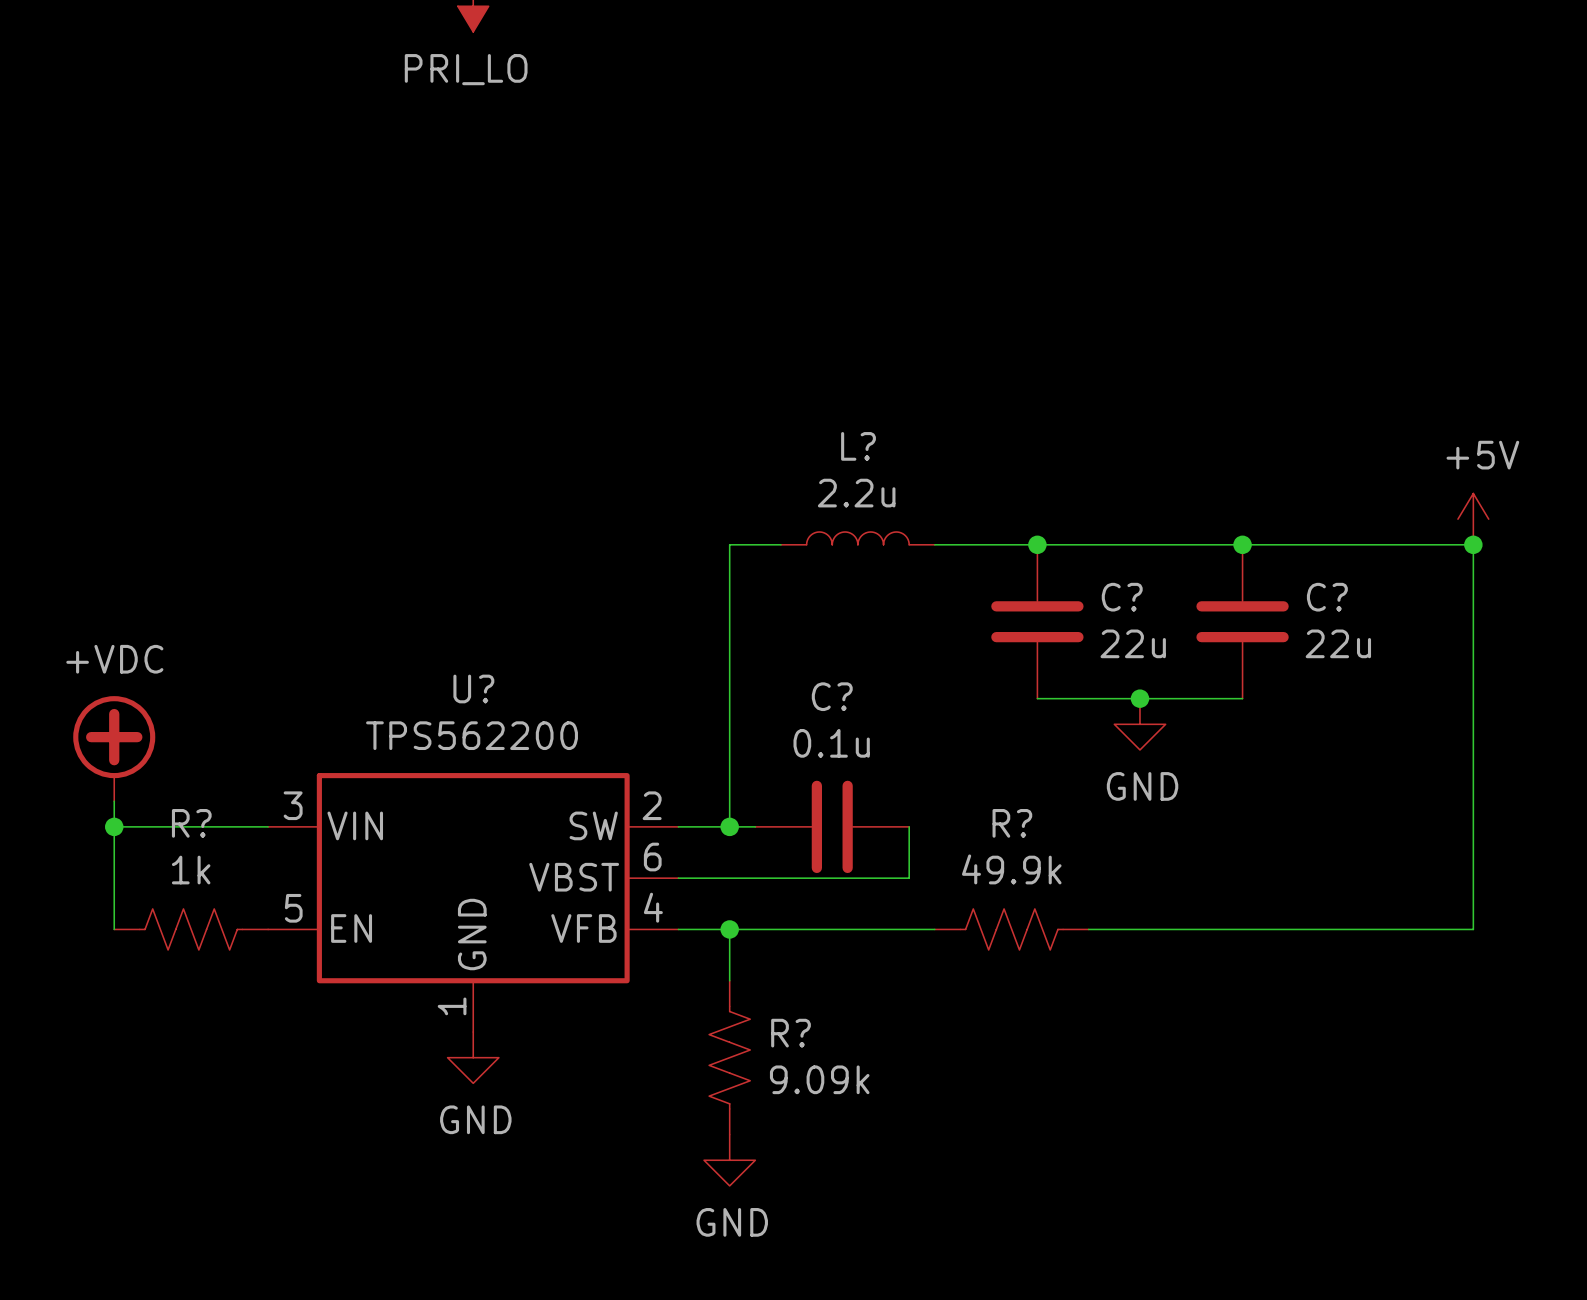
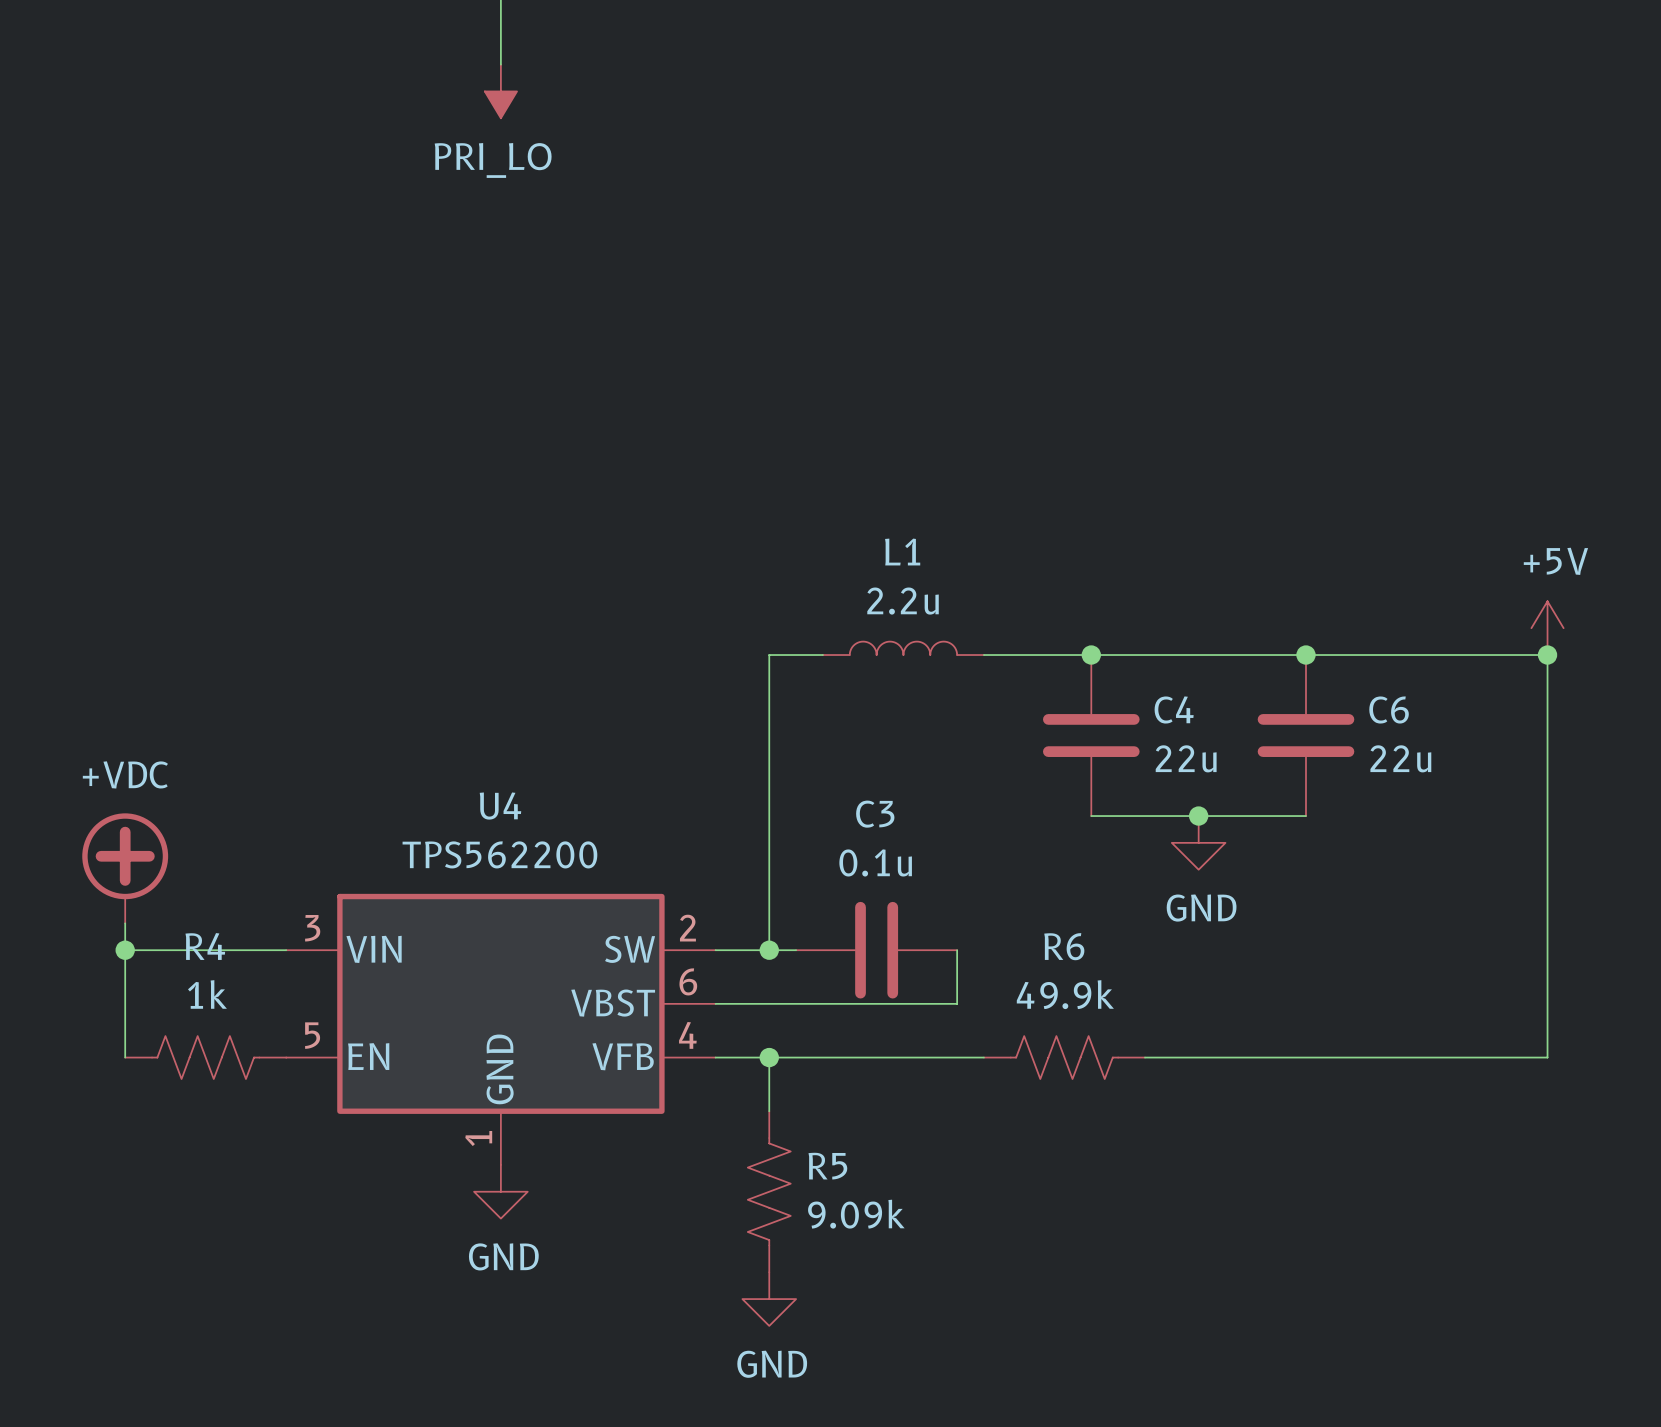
L? name: L? (858, 446) -> L1 (902, 552)
C? name: C? (1122, 597) -> C4 (1174, 709)
C? name: C? (1327, 597) -> C6 (1389, 710)
U? name: U? (473, 688) -> U4 (500, 806)
C? name: C? (832, 696) -> C3 (875, 814)
R? name: R? (191, 823) -> R4 (205, 946)
R? name: R? (1012, 823) -> R6 (1064, 946)
R? name: R? (791, 1033) -> R5 (827, 1166)

